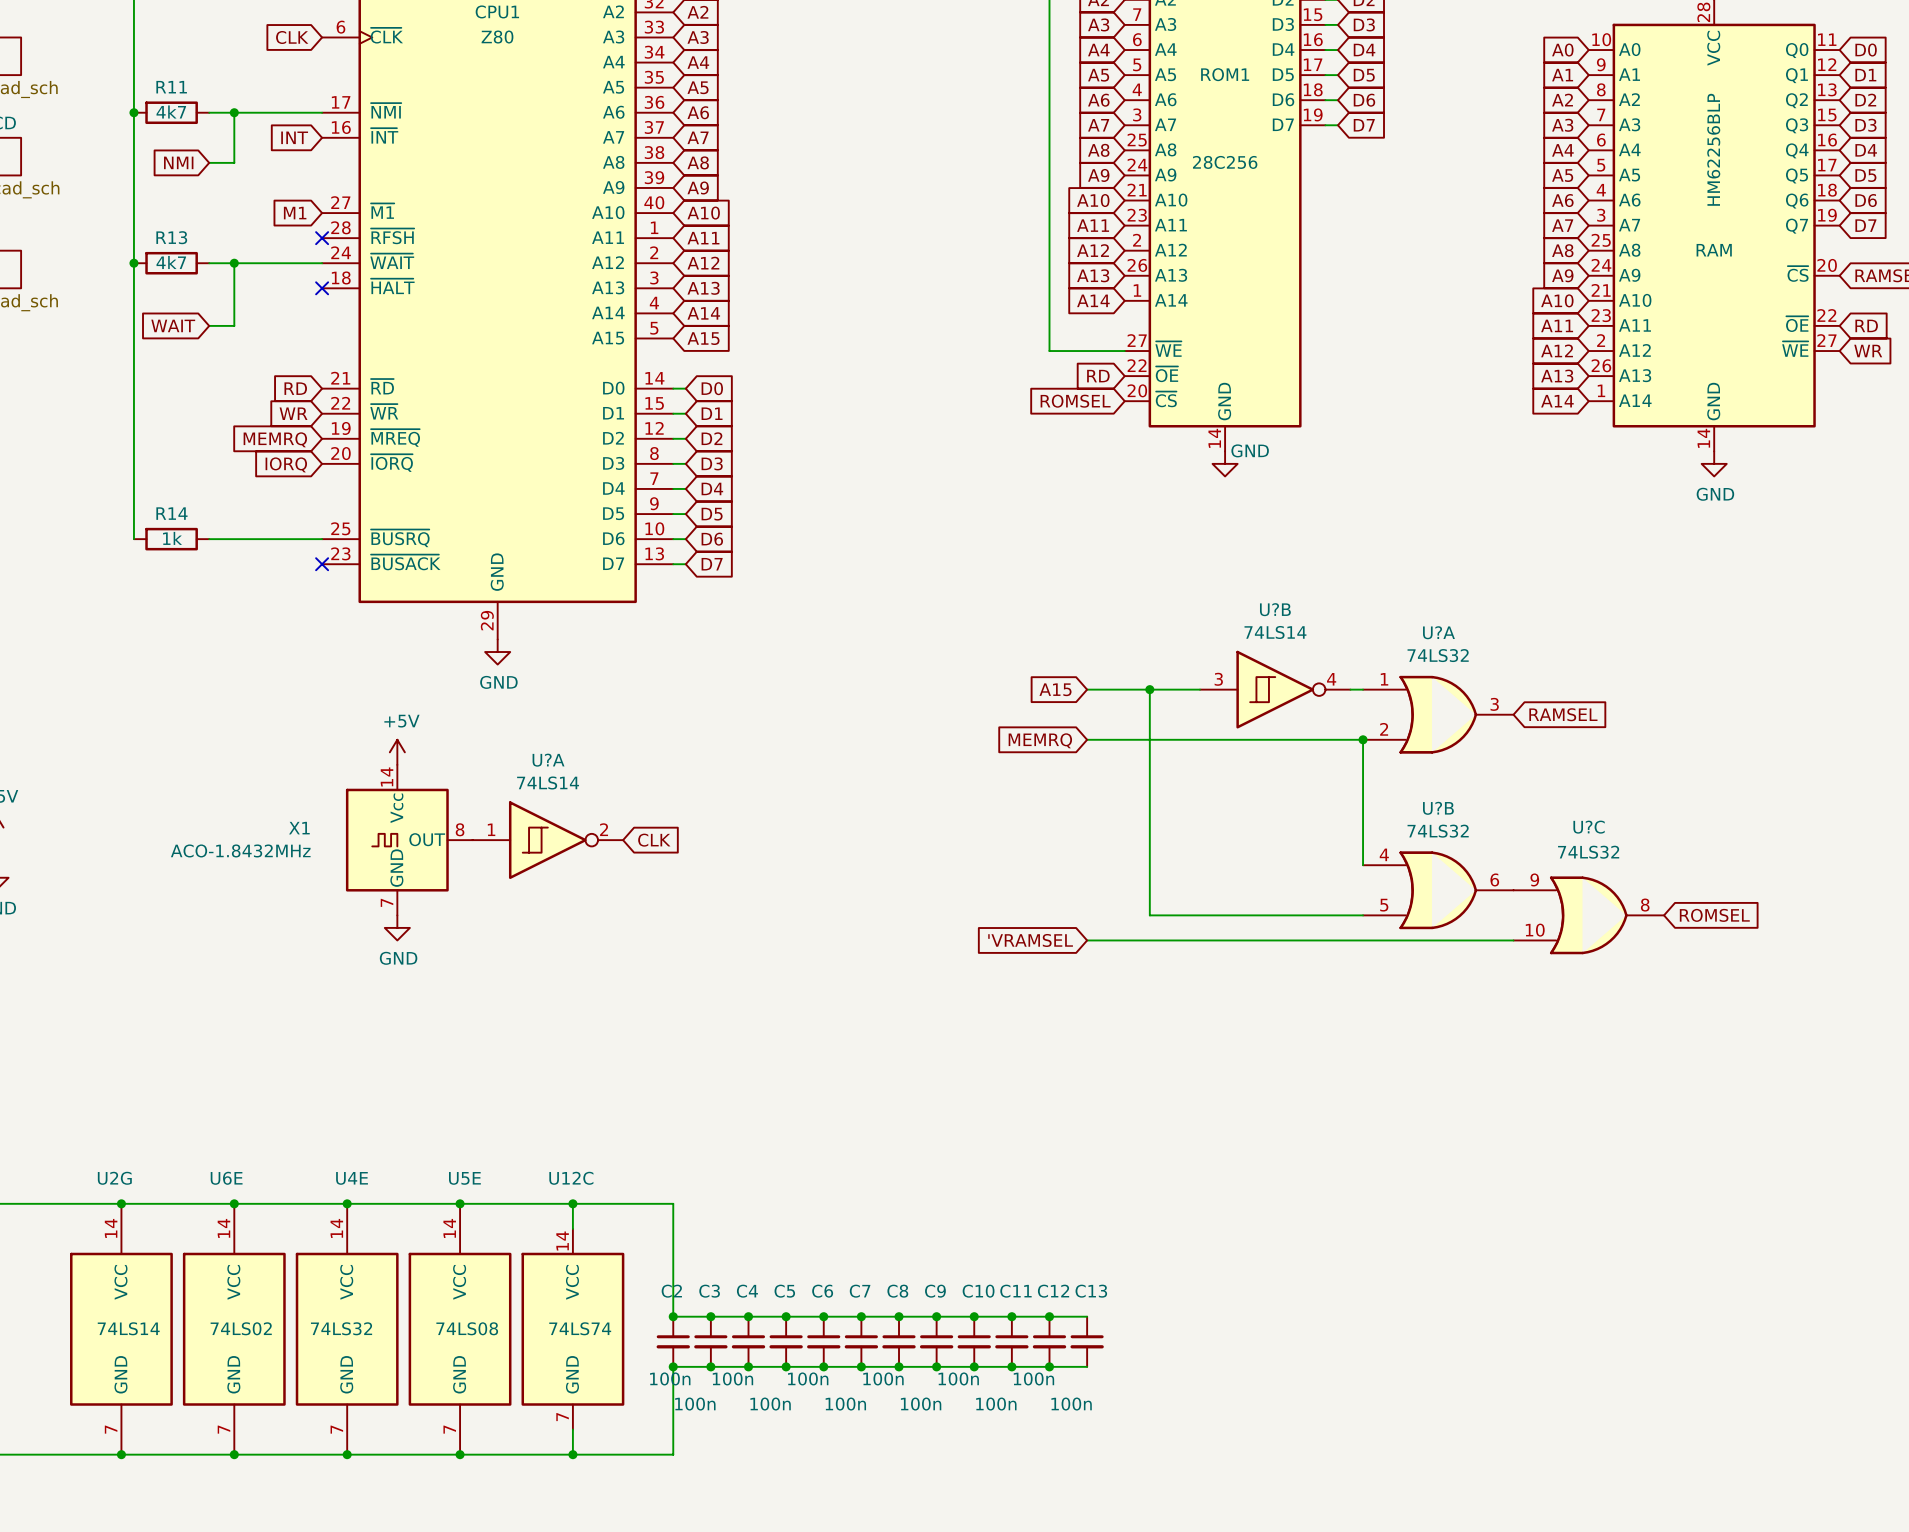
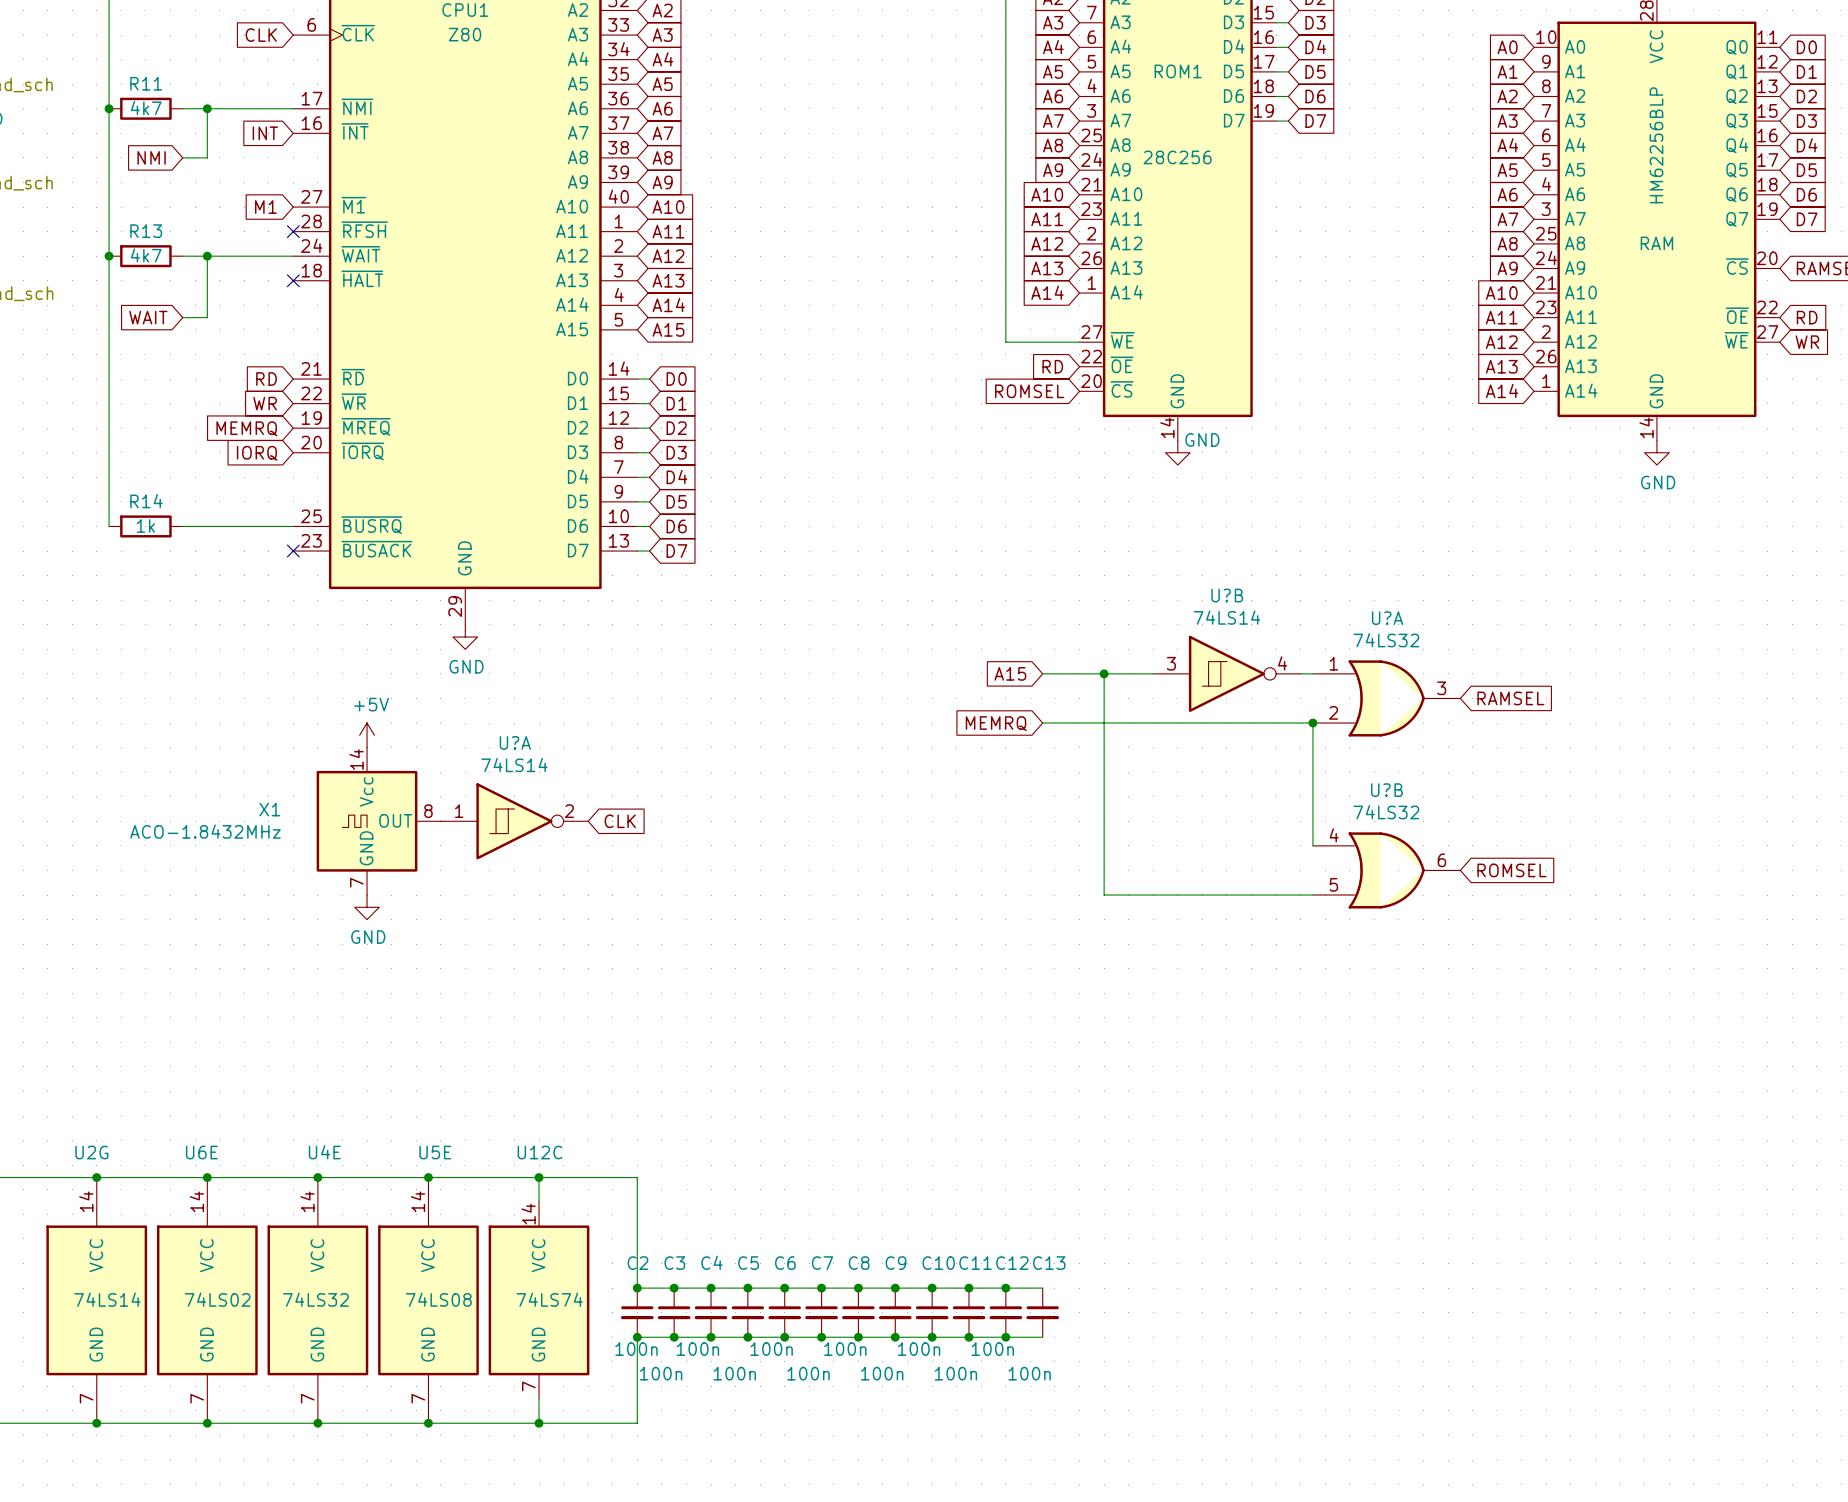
U?C: 74LS32 (1588, 915) -> none
global label position: ROMSEL (1714, 915) -> ROMSEL (1512, 870)
global label: 'VRAMSEL (1030, 940) -> none
wire: (1087, 940) (1513, 940) -> none

